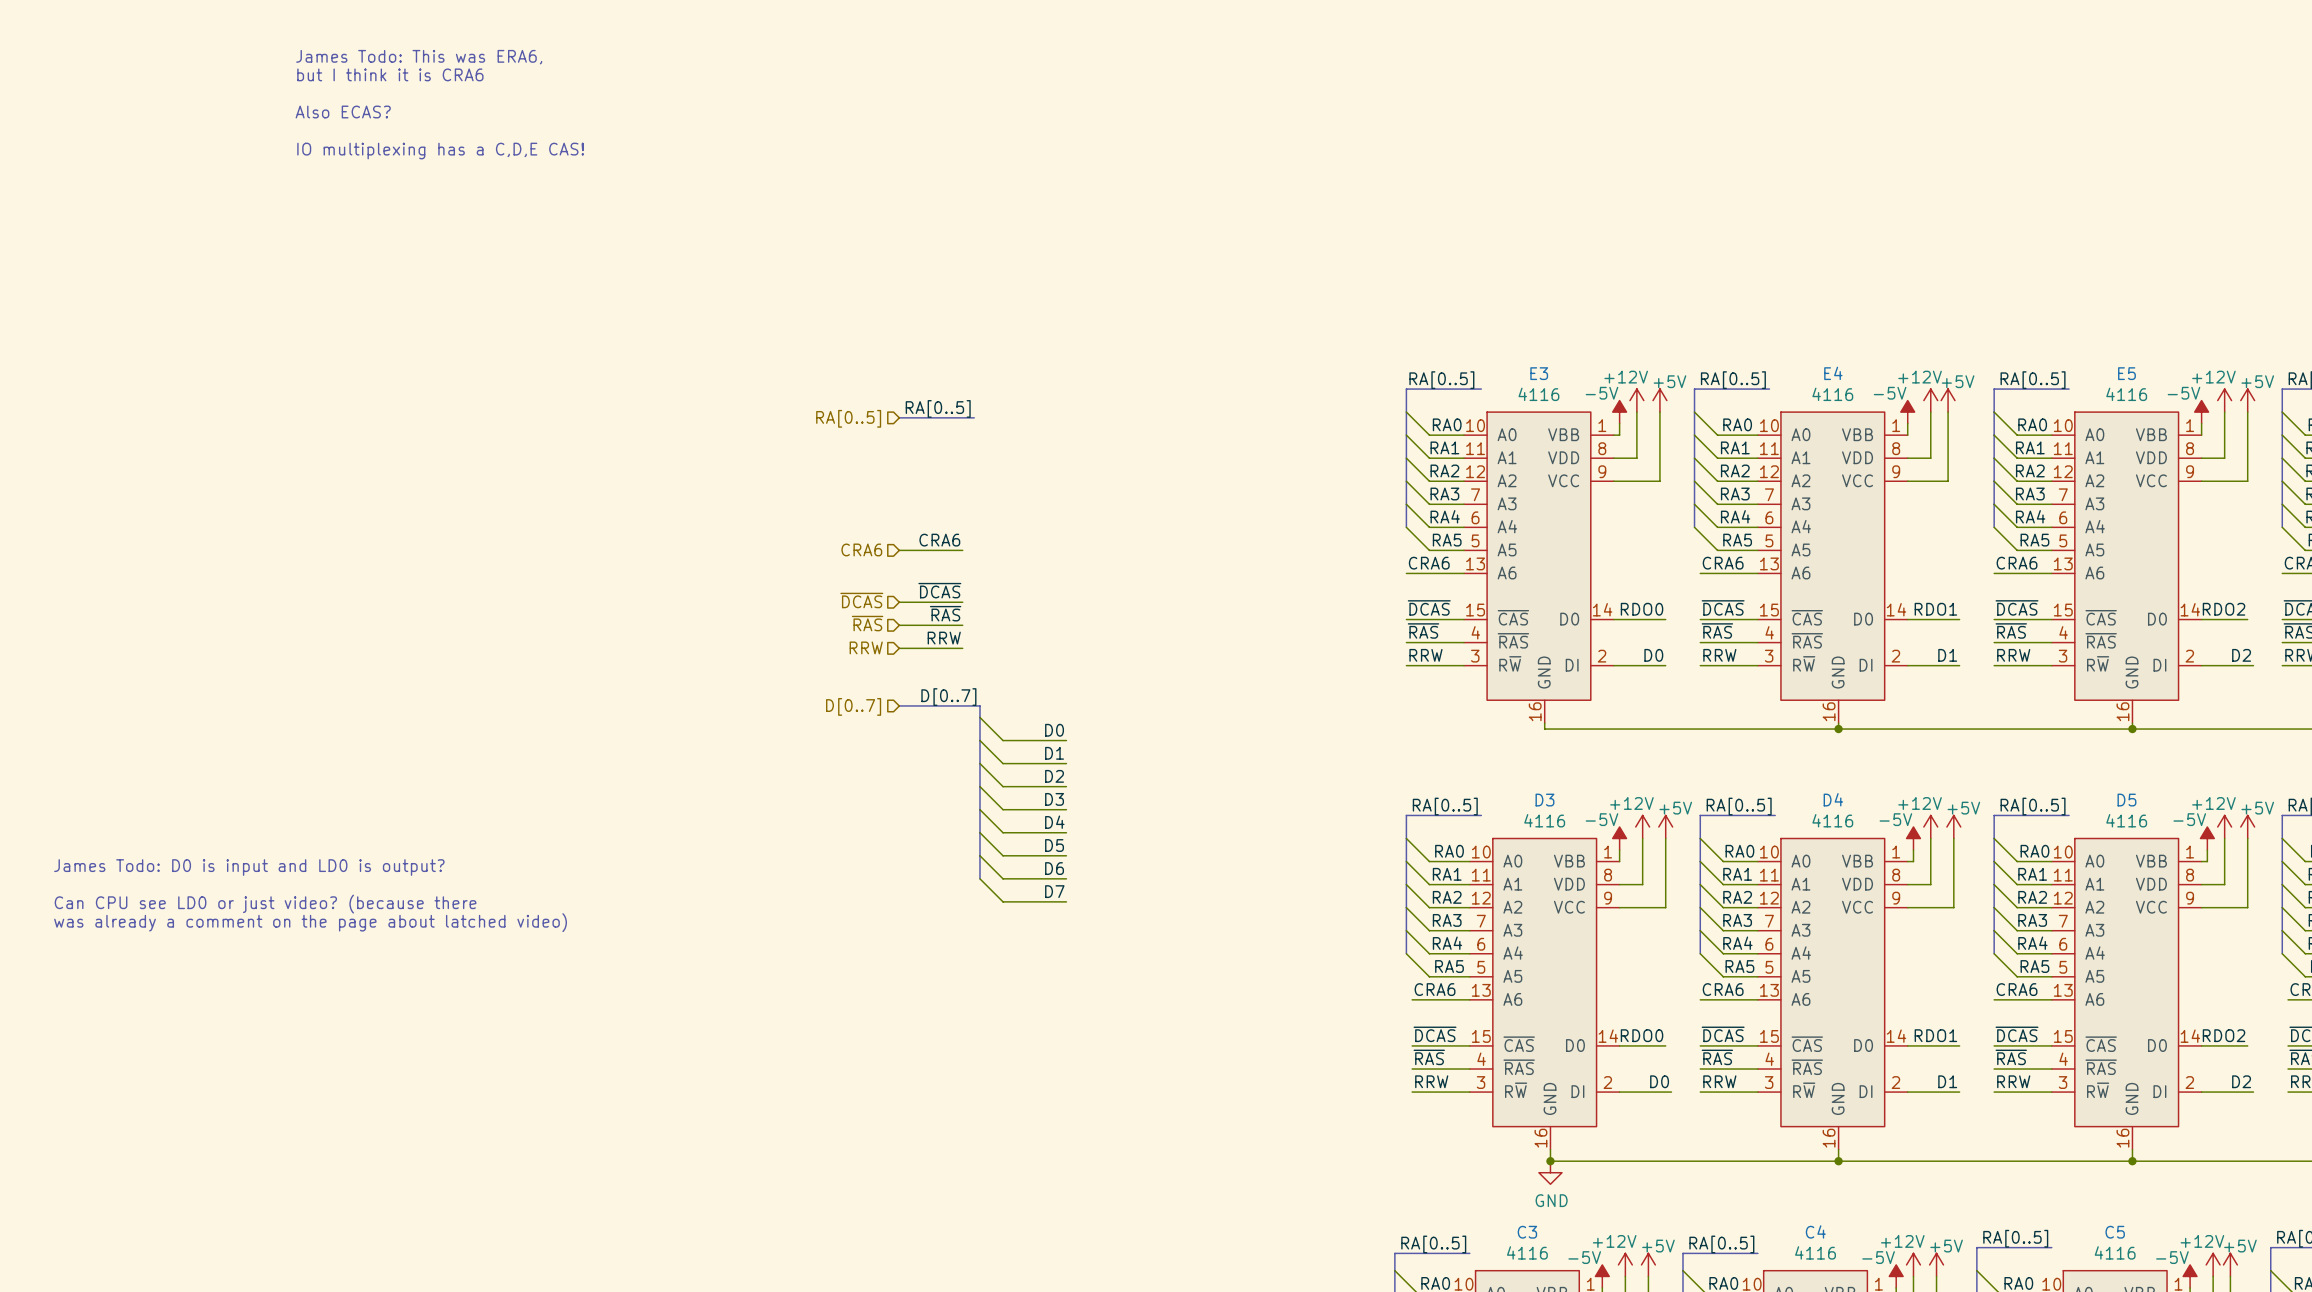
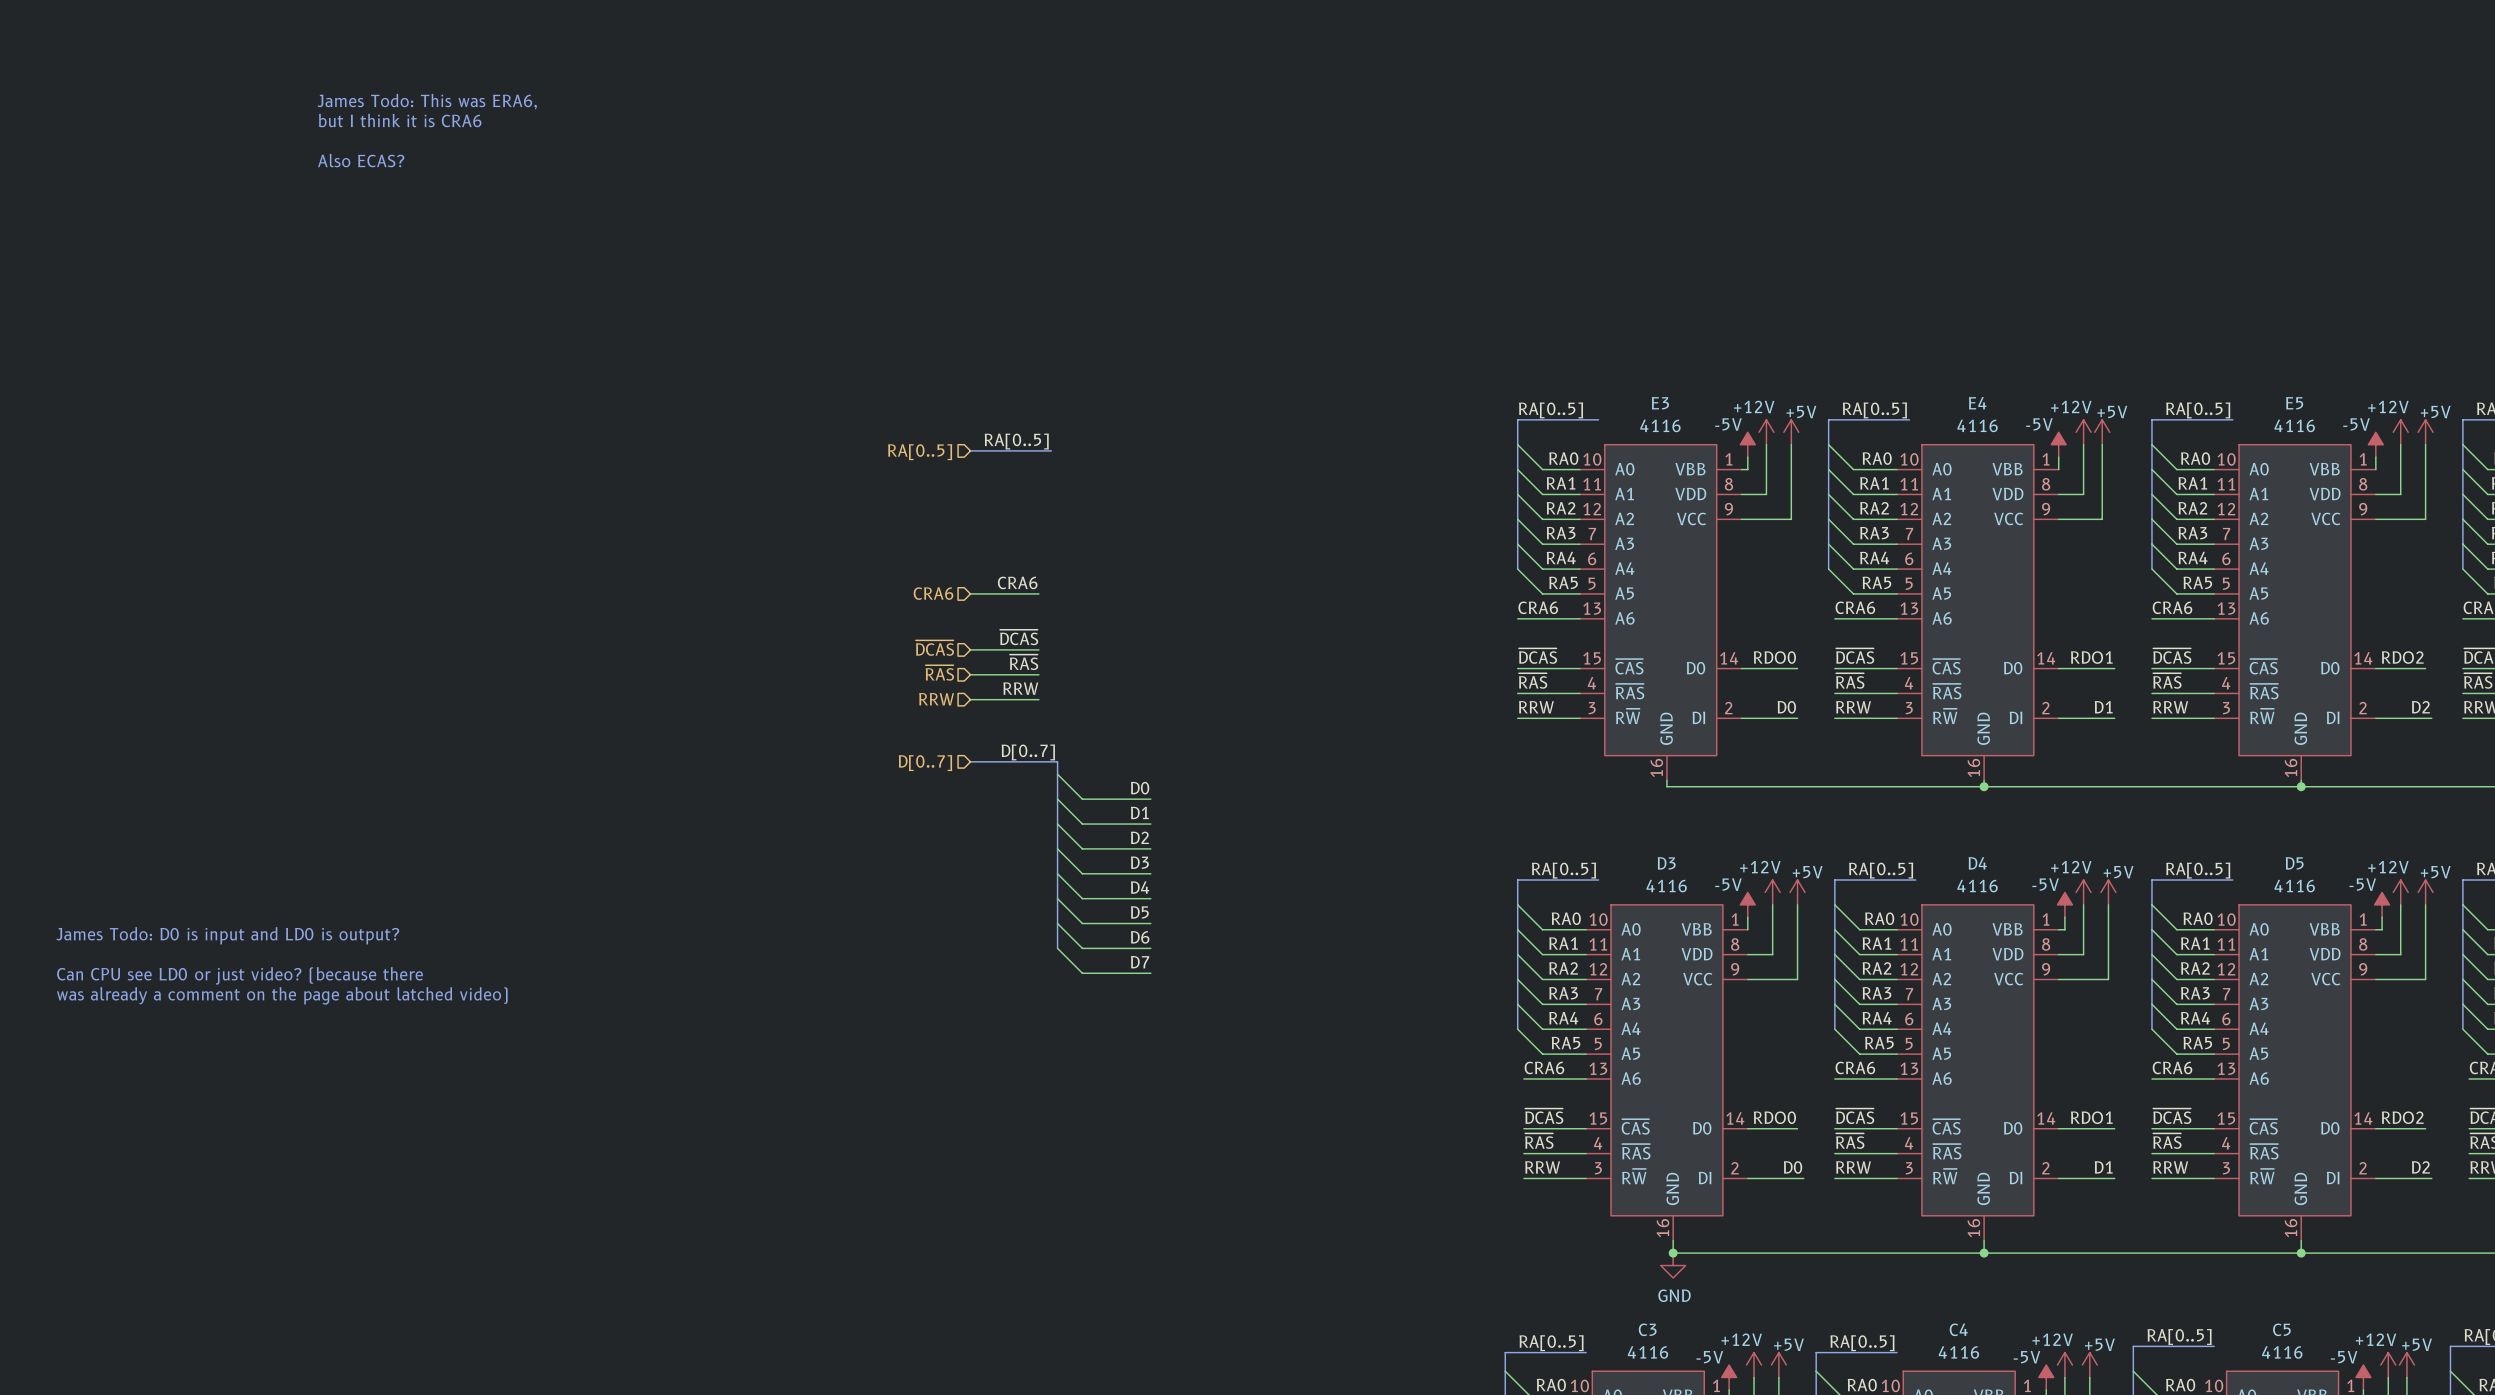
text position: James Todo: This was ERA6, (419, 57) -> James Todo: This was ERA6, (427, 101)
text: but I think it is CRA6 (390, 74) -> none
text: Also ECAS? (343, 112) -> but I think it is CRA6 (400, 120)
text: IO multiplexing has a C,D,E CAS! (440, 151) -> Also ECAS? (361, 160)

